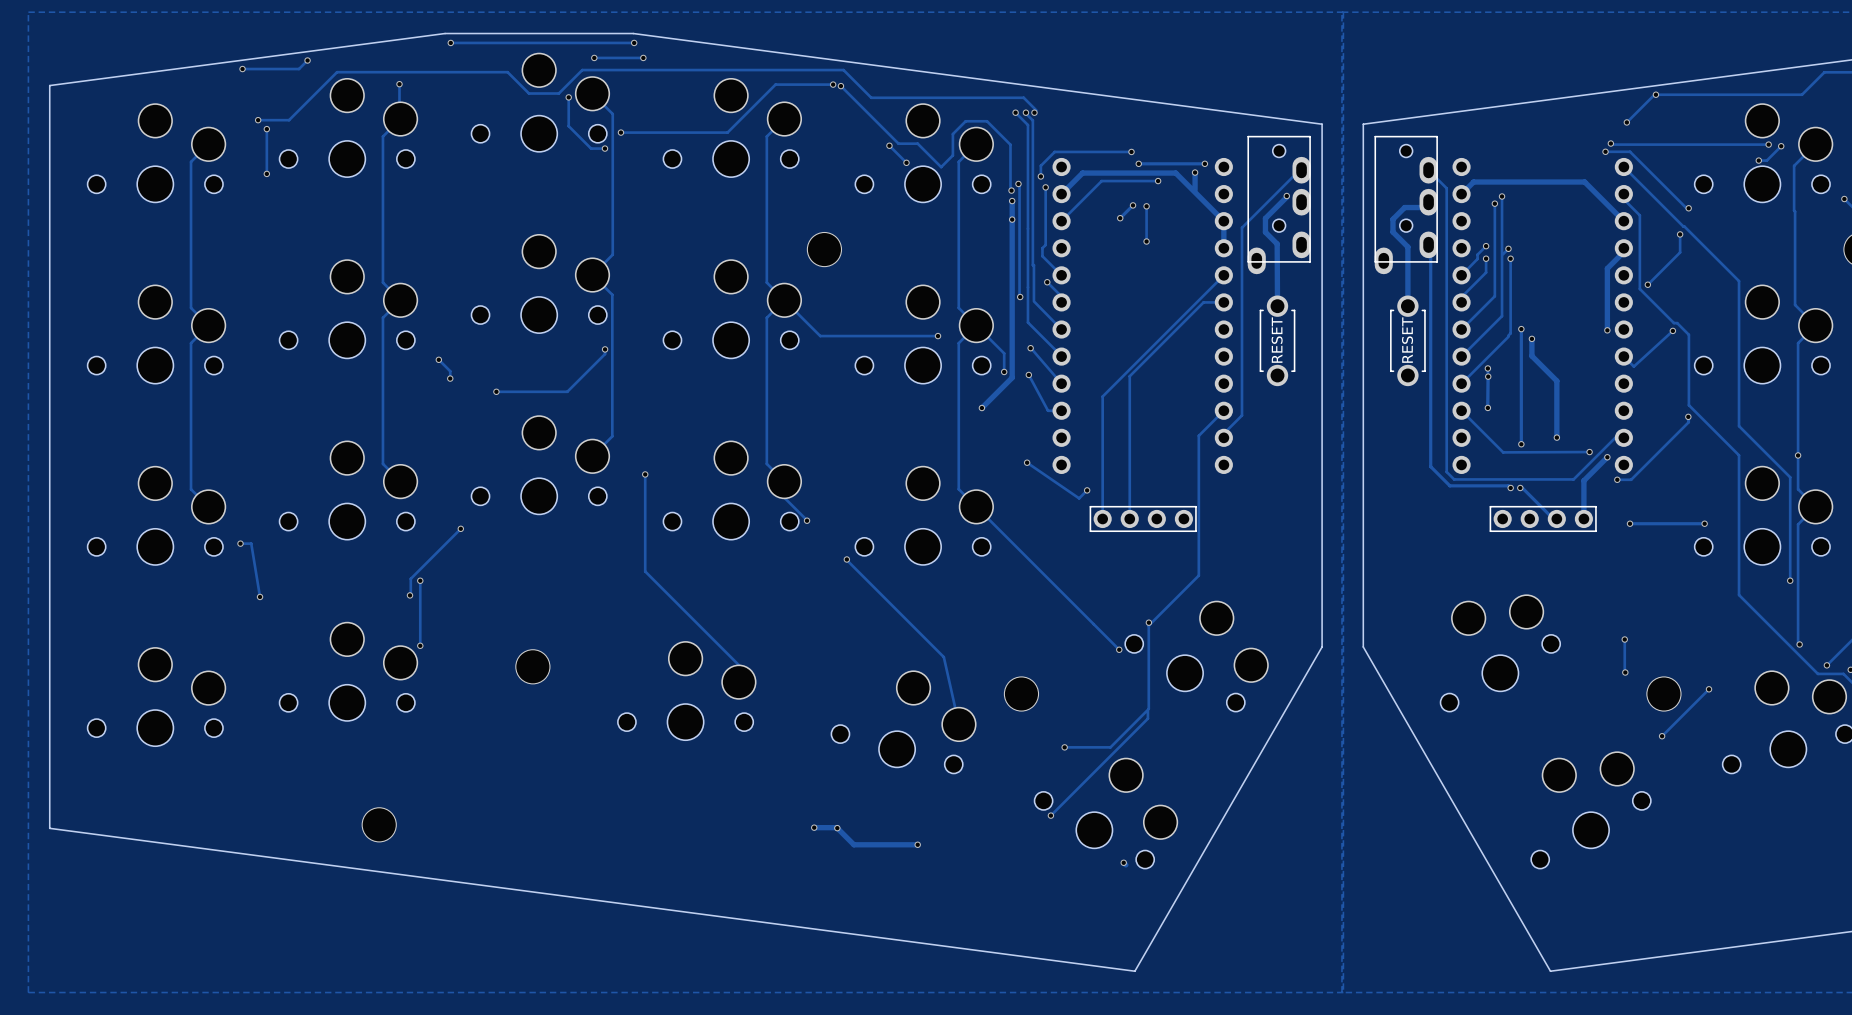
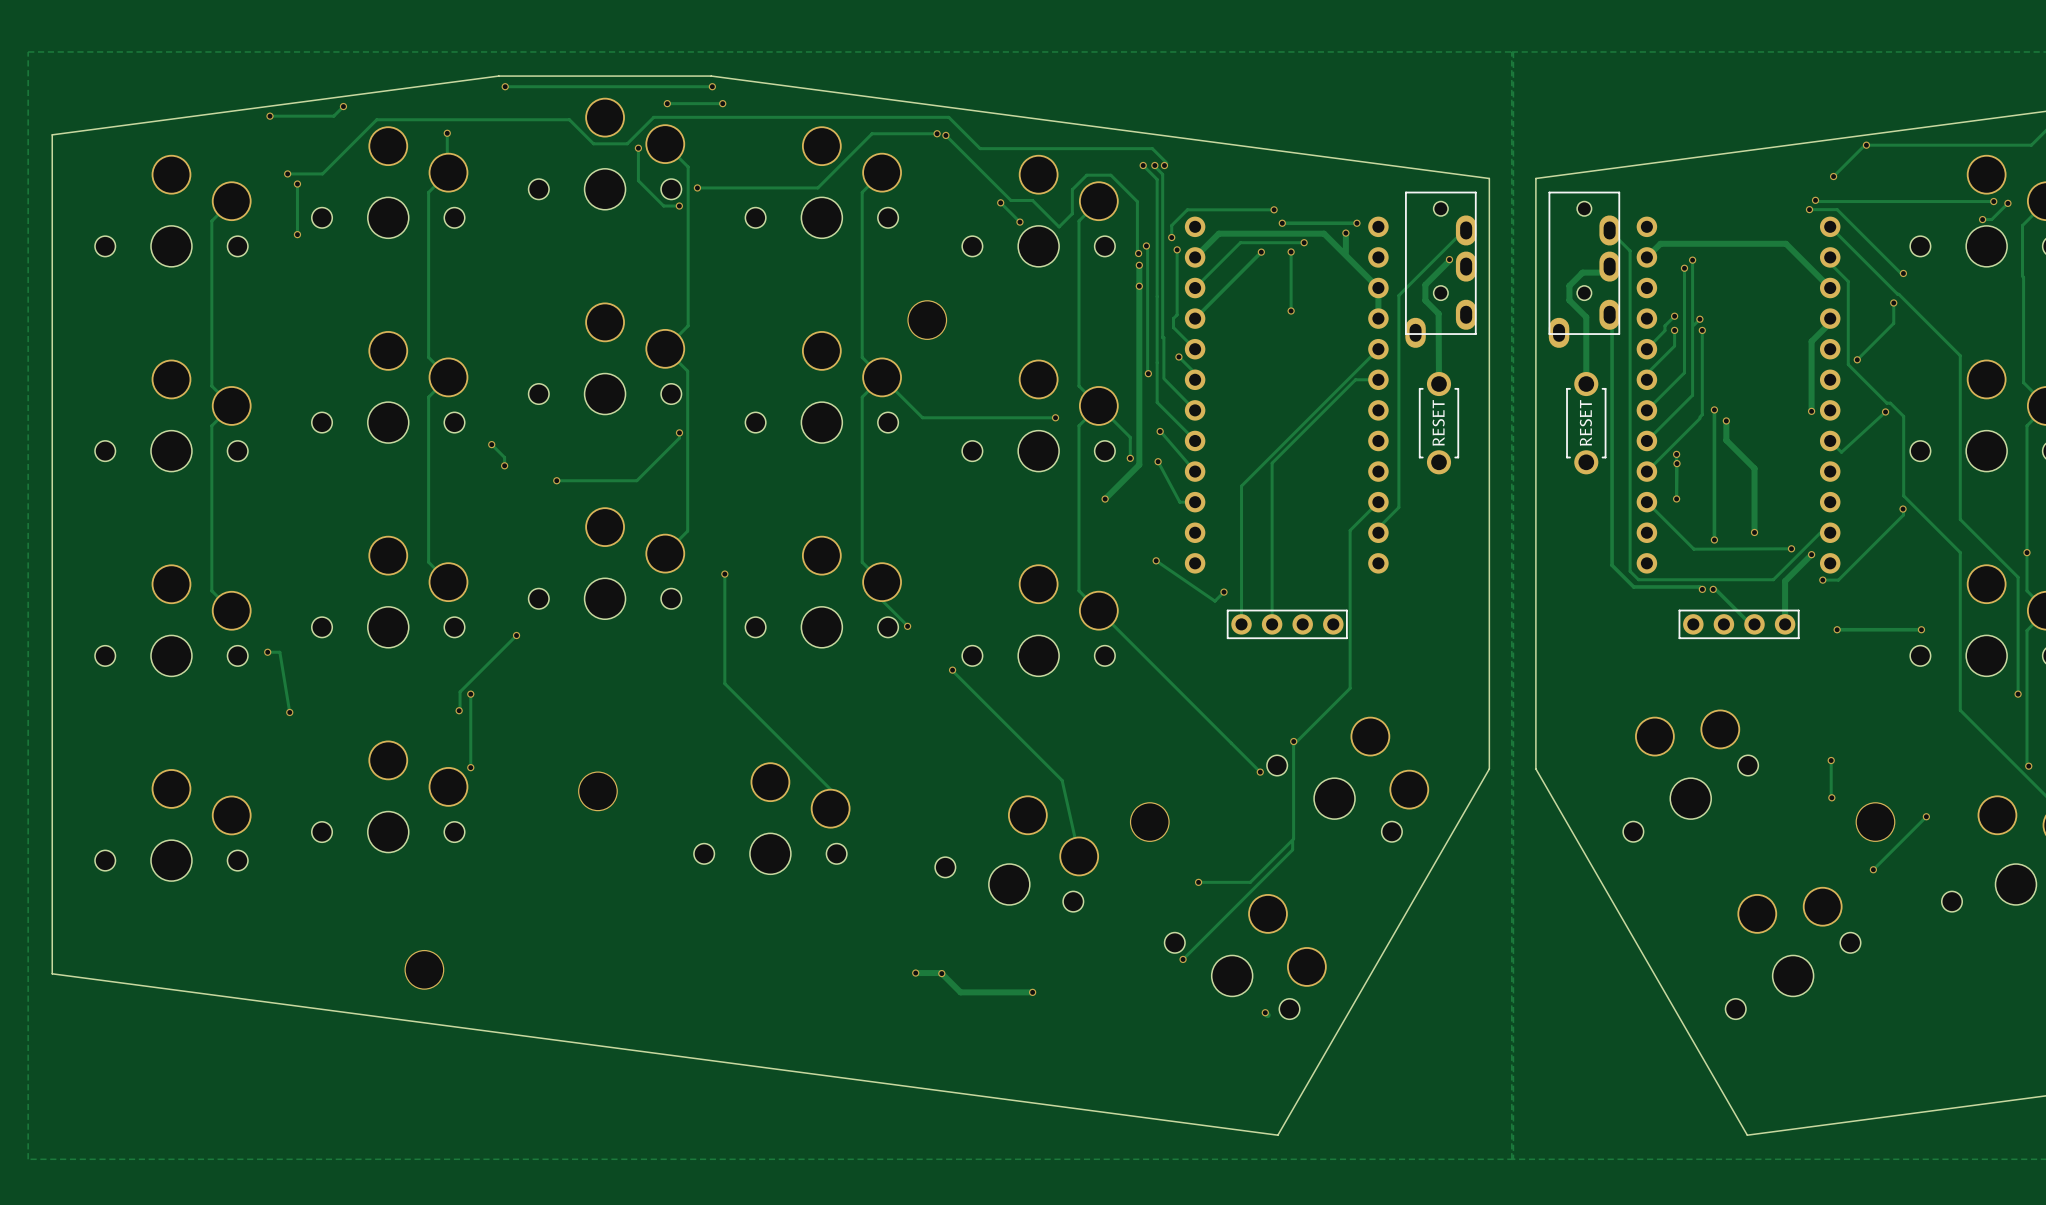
track: none -> (1261, 252) (1195, 318)
via: none -> (1261, 252)
track: none -> (1291, 251) (1291, 271)
via: none -> (1291, 251)
track: (1133, 205) (1120, 218) -> none
via: (1133, 205) -> none
via: (1146, 206) -> none
via: (1120, 218) -> none

